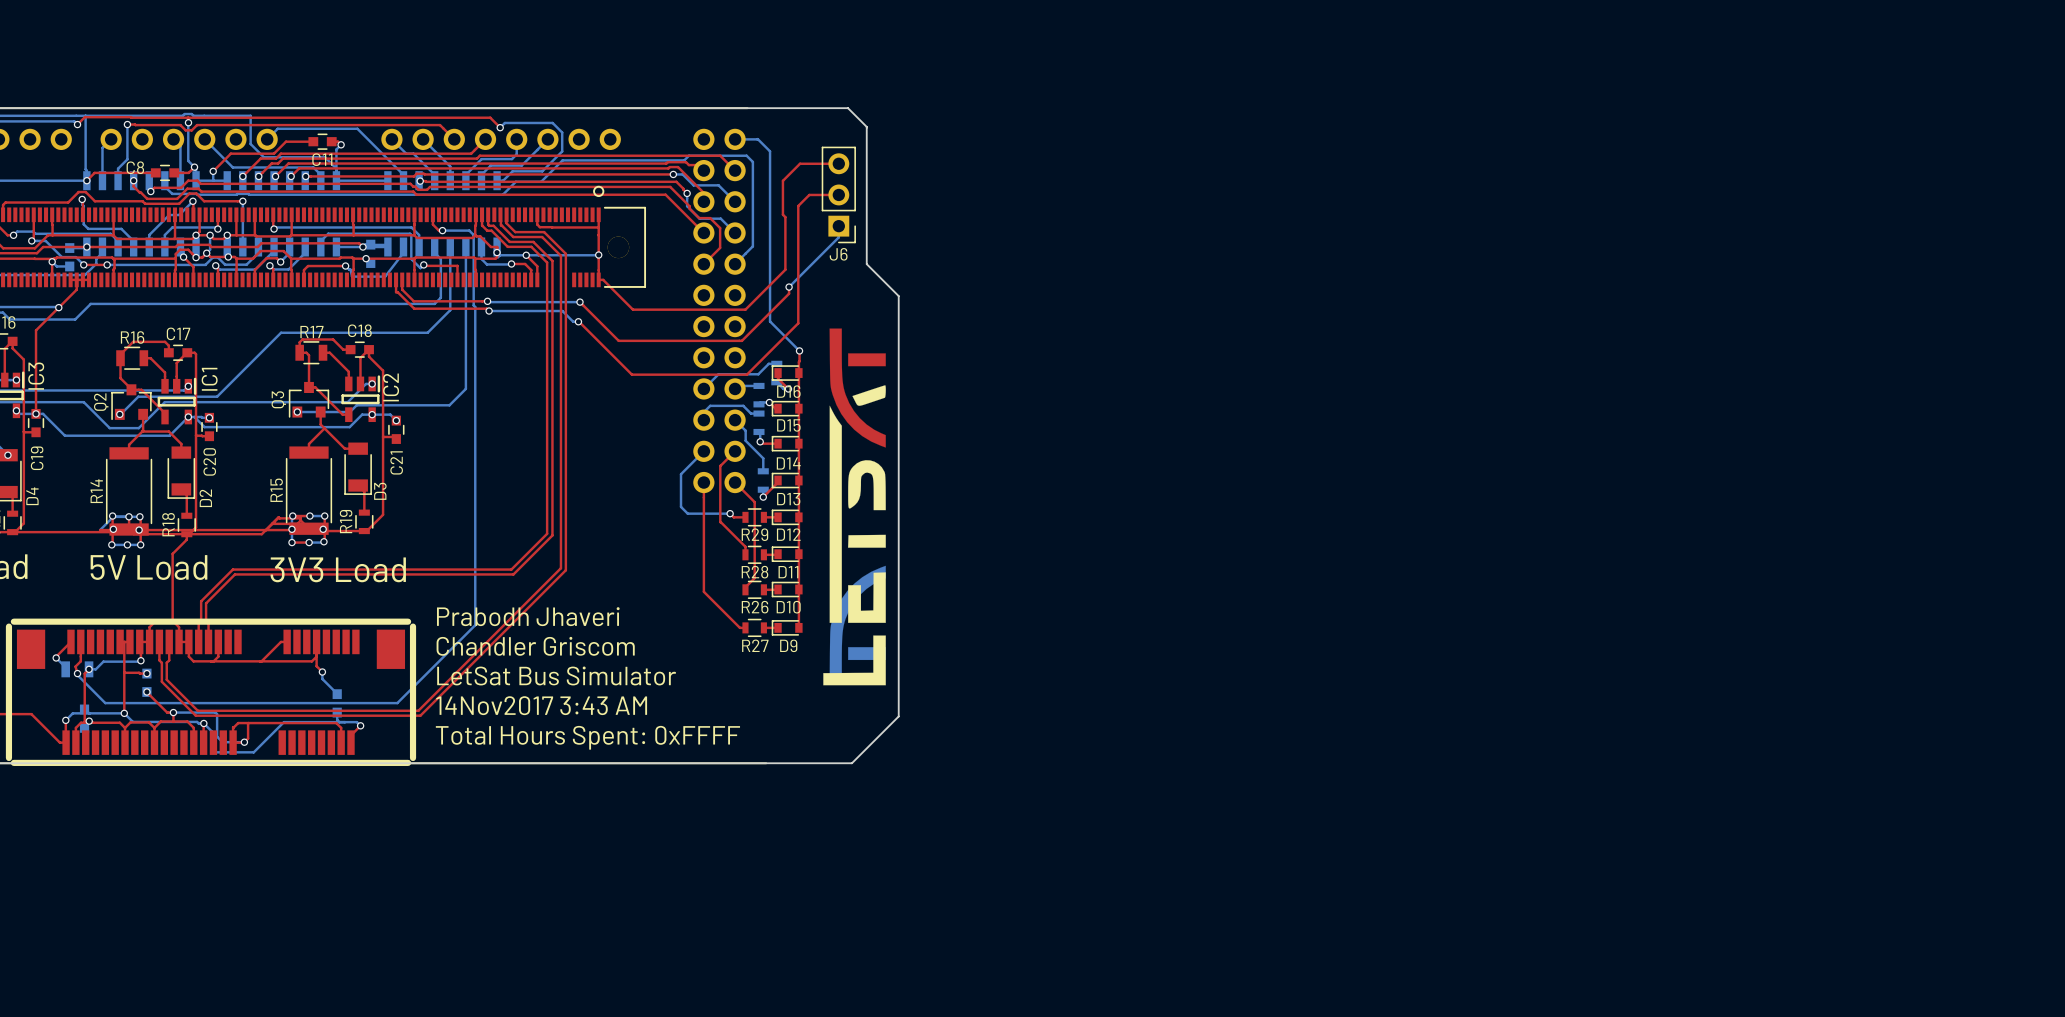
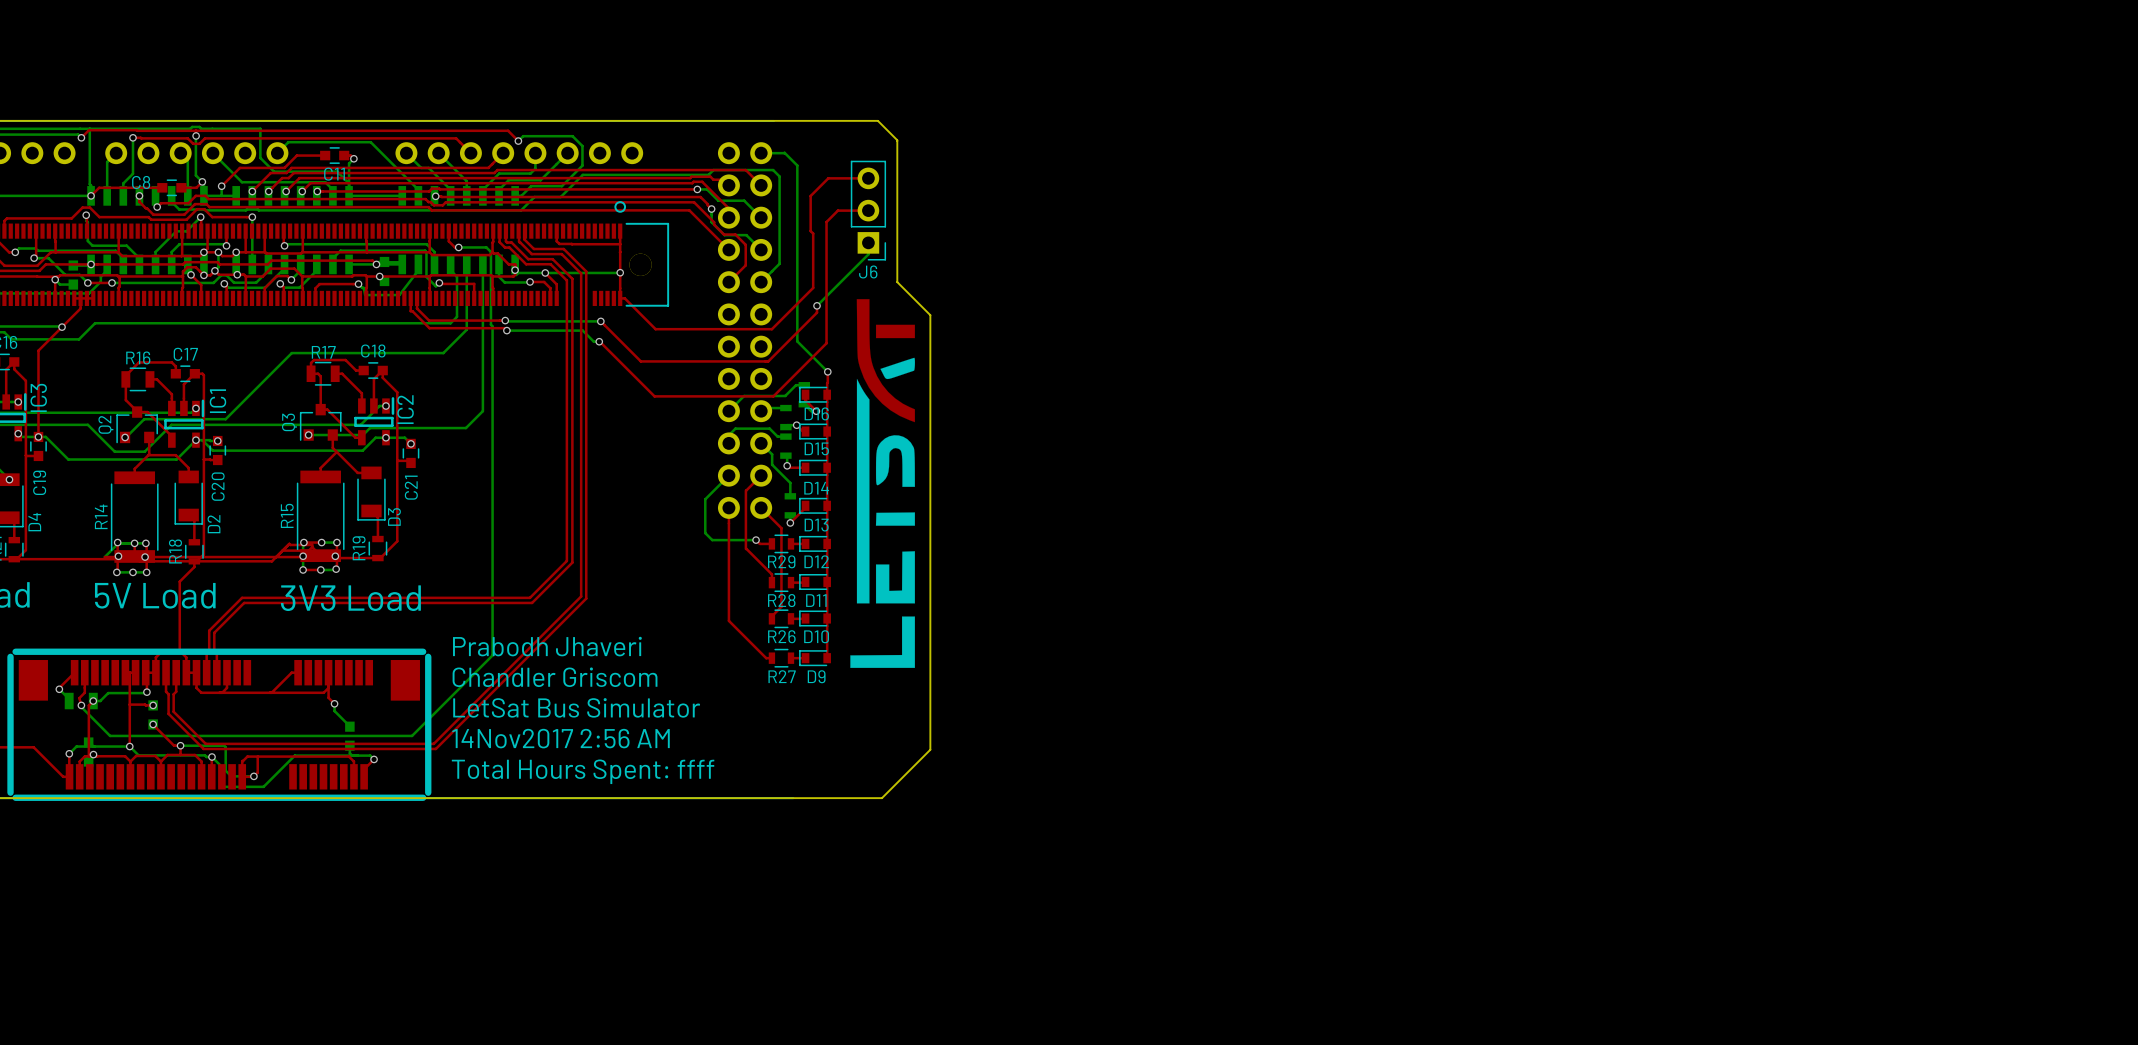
drawing position: (854, 506) -> (882, 483)
drawing: [829, 565, 886, 685] -> none
text: 14Nov2017 3:43 AM (541, 705) -> 14Nov2017 2:56 AM (560, 738)
text: Total Hours Spent: 0xFFFF (587, 737) -> Total Hours Spent: ffff (583, 771)

